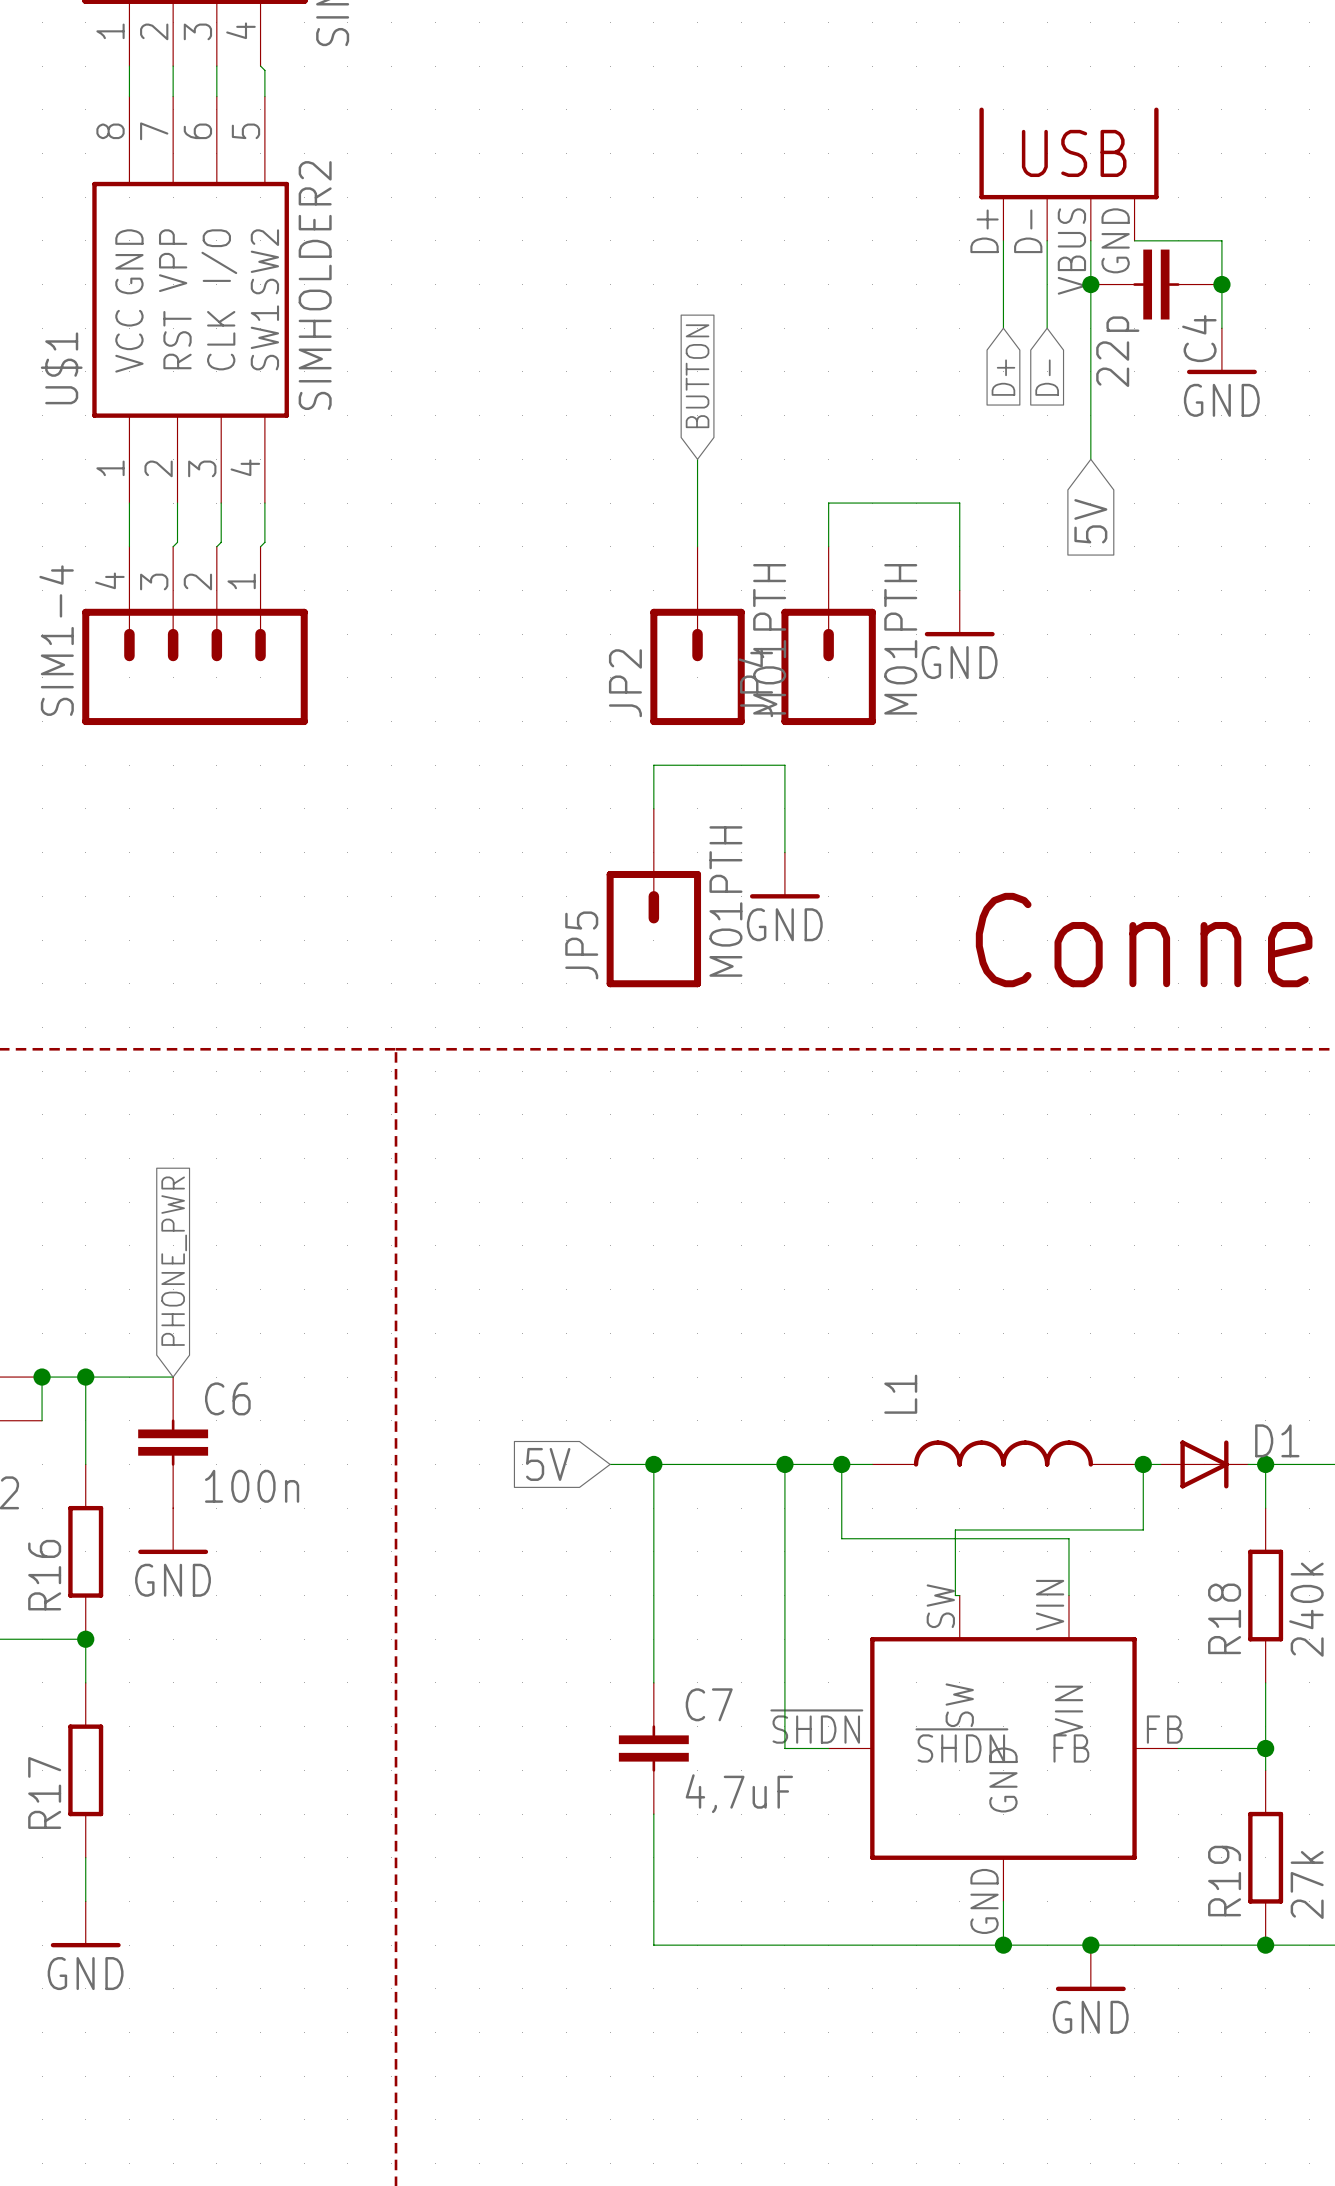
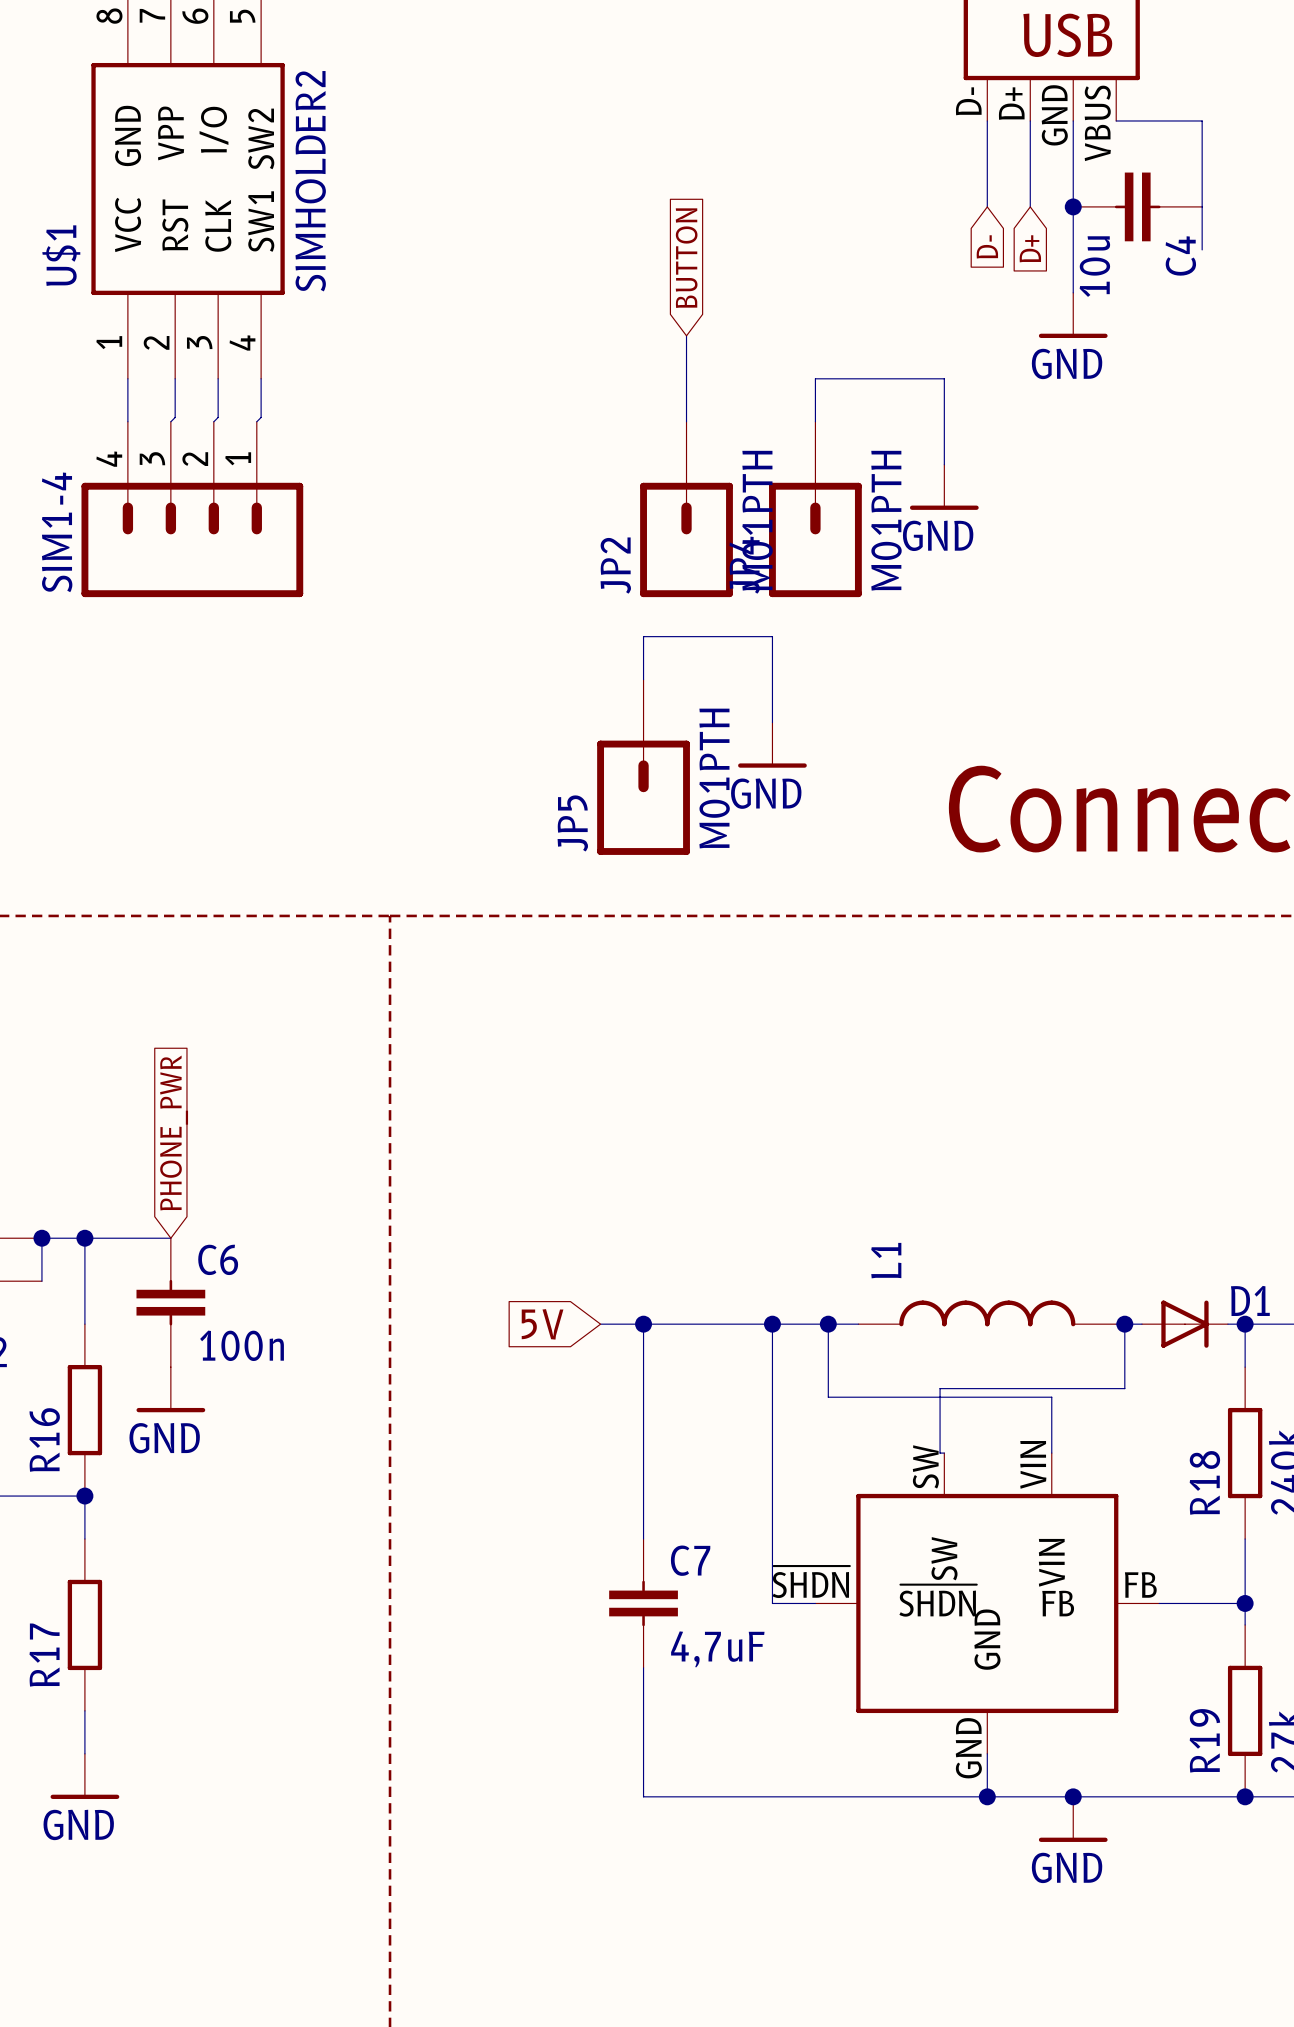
part pin number: D+ (984, 231) -> D- (968, 101)
part pin number: D- (1028, 231) -> D+ (1011, 103)
part pin number: GND (1115, 240) -> VBUS (1097, 123)
part pin number: VBUS (1071, 251) -> GND (1054, 115)
junction position: (1090, 284) -> (1073, 206)
C4 position: (1156, 284) -> (1137, 206)
junction: (1221, 284) -> none
C4 value: 22p (1117, 351) -> 10u (1094, 266)
power symbol position: GND (1221, 351) -> GND (1073, 315)
global label: D+ (1003, 377) -> D- (987, 246)
global label: D- (1047, 377) -> D+ (1030, 248)
global label: 5V (1090, 521) -> none

